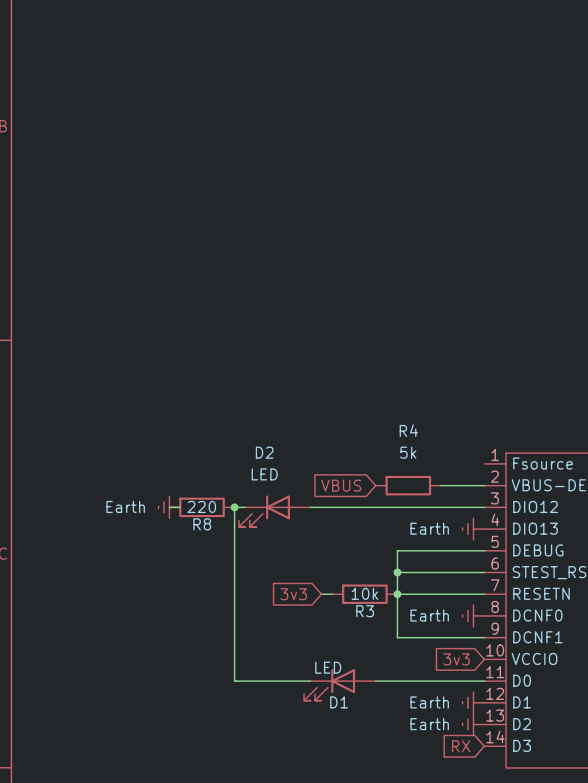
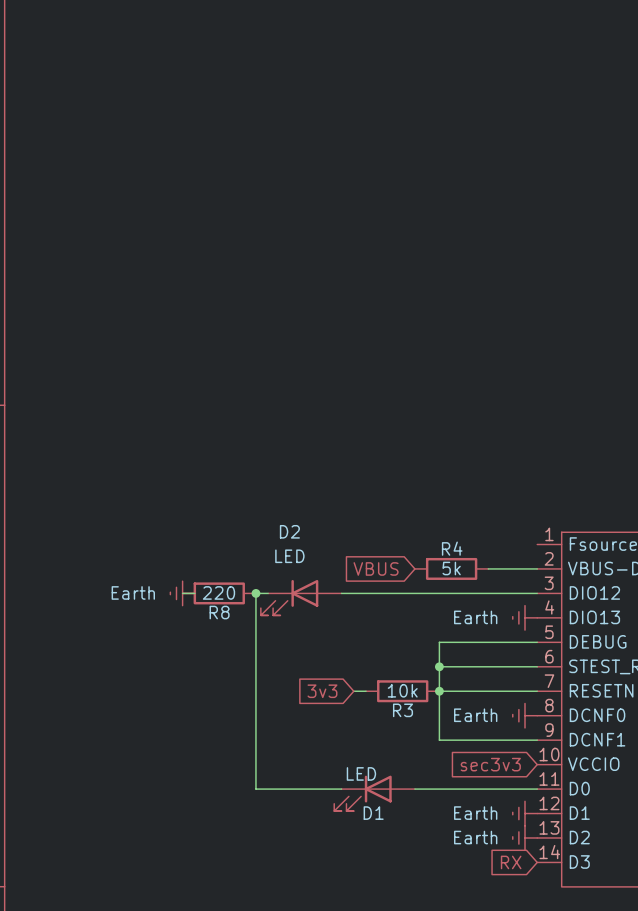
R4 name position: R4 (408, 430) -> R4 (452, 548)
R4 value position: 5k (408, 452) -> 5k (451, 568)
global label: 3v3 (456, 659) -> sec3v3 (490, 764)

